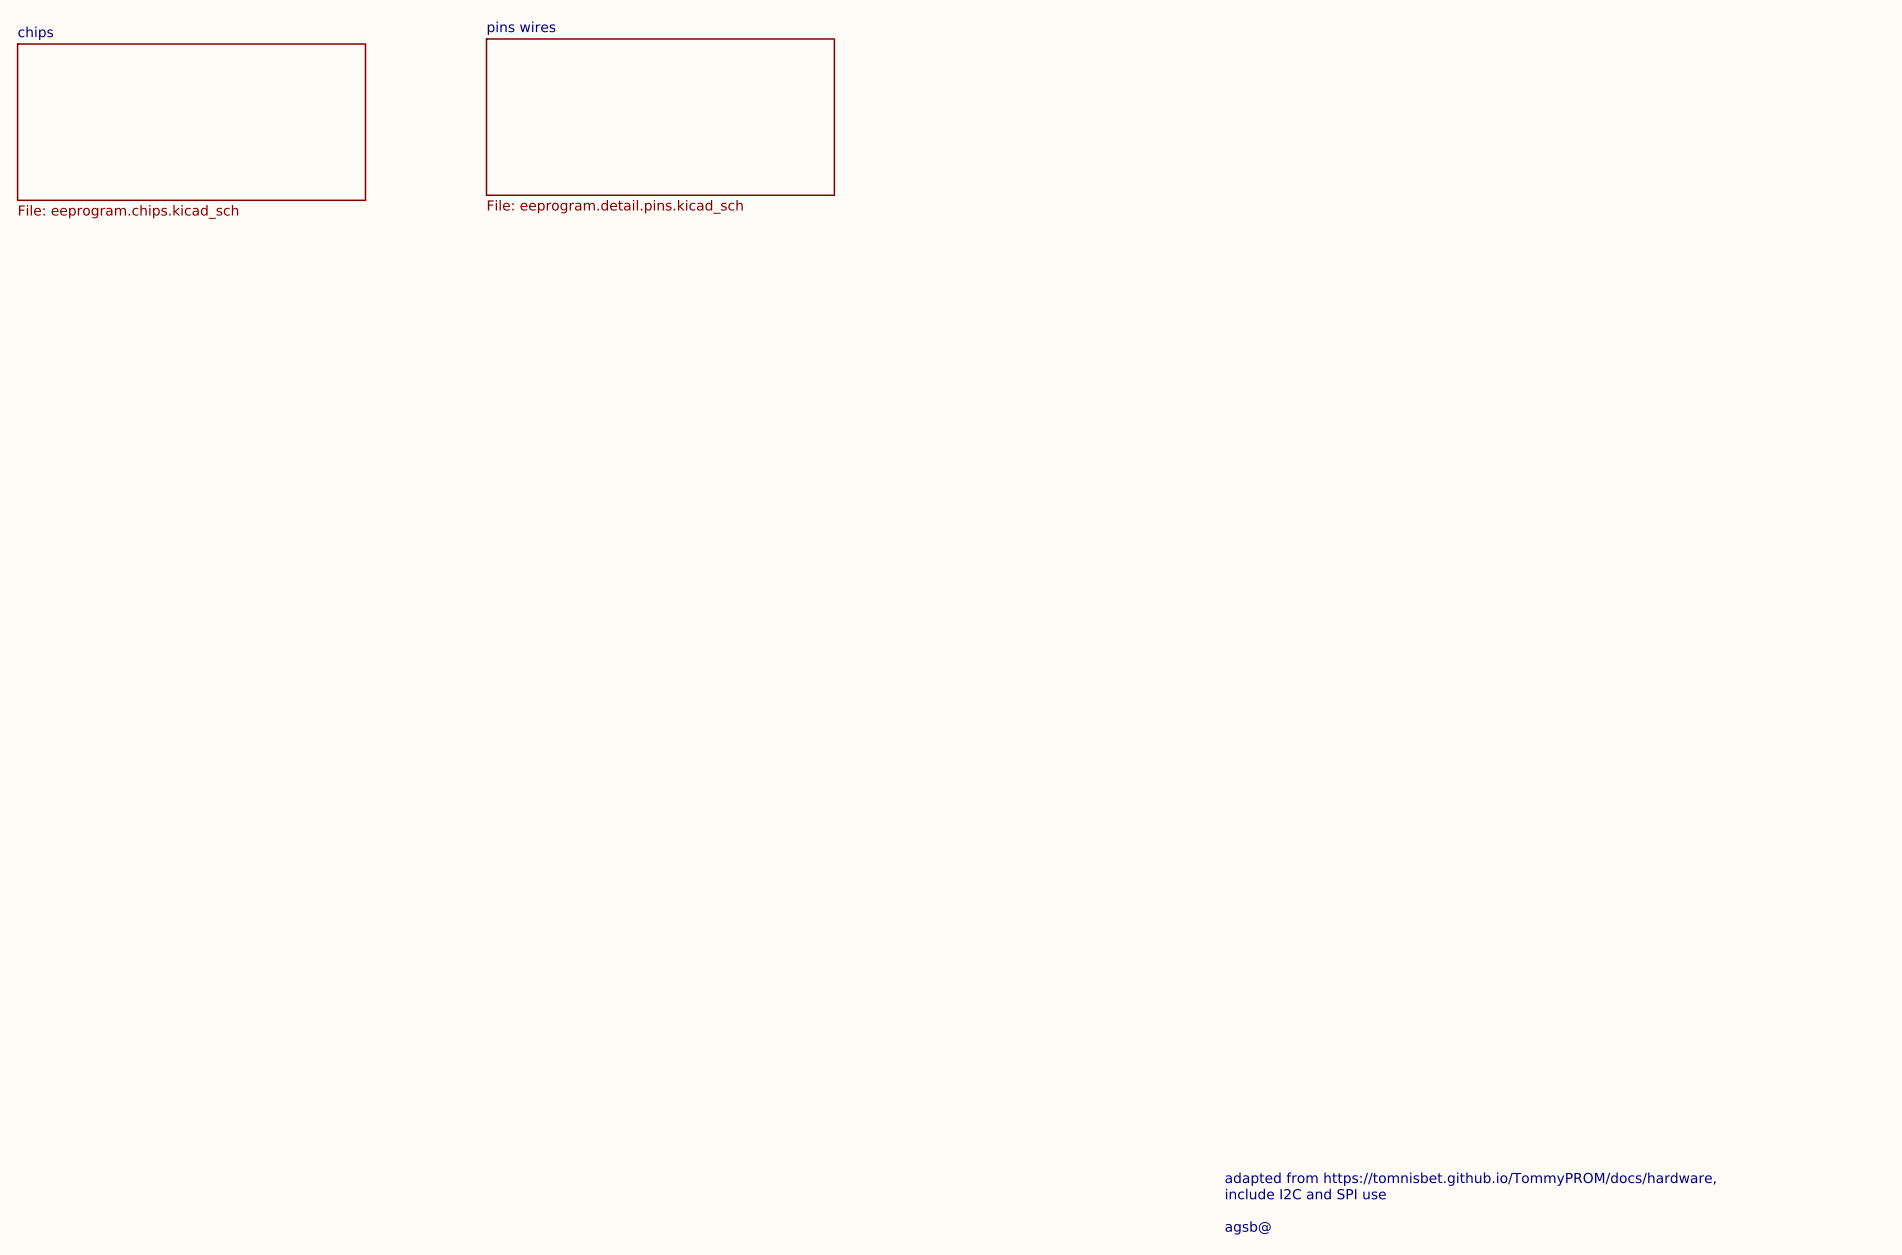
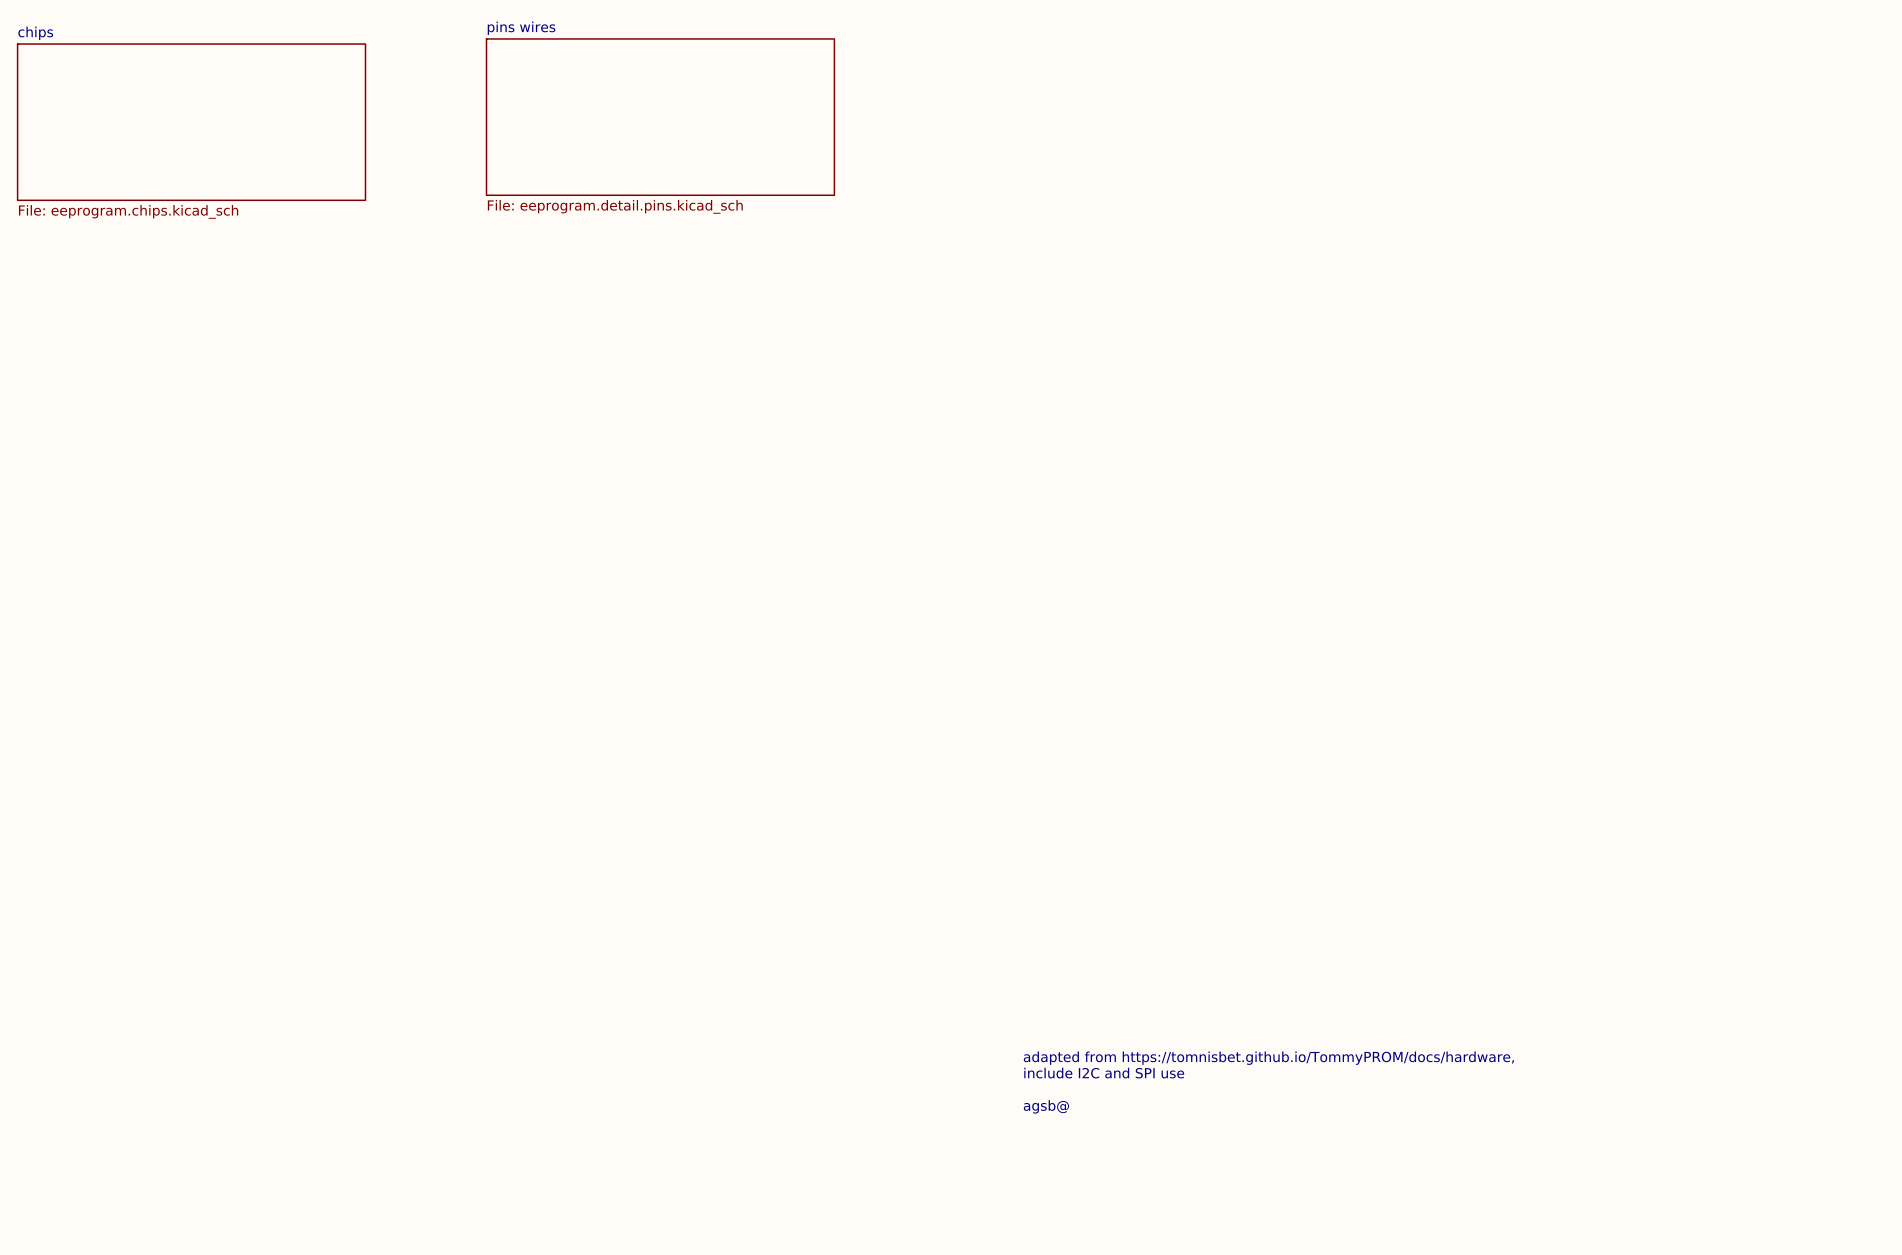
text: none -> adapted from https://tomnisbet.github.io/TommyPROM/docs/hardware, (1268, 1058)
text: none -> include I2C and SPI use (1104, 1073)
text: none -> agsb@ (1046, 1106)
text: adapted from https://tomnisbet.github.io/TommyPROM/docs/hardware, (1470, 1179) -> none
text: include I2C and SPI use (1305, 1194) -> none
text: agsb@ (1248, 1227) -> none

